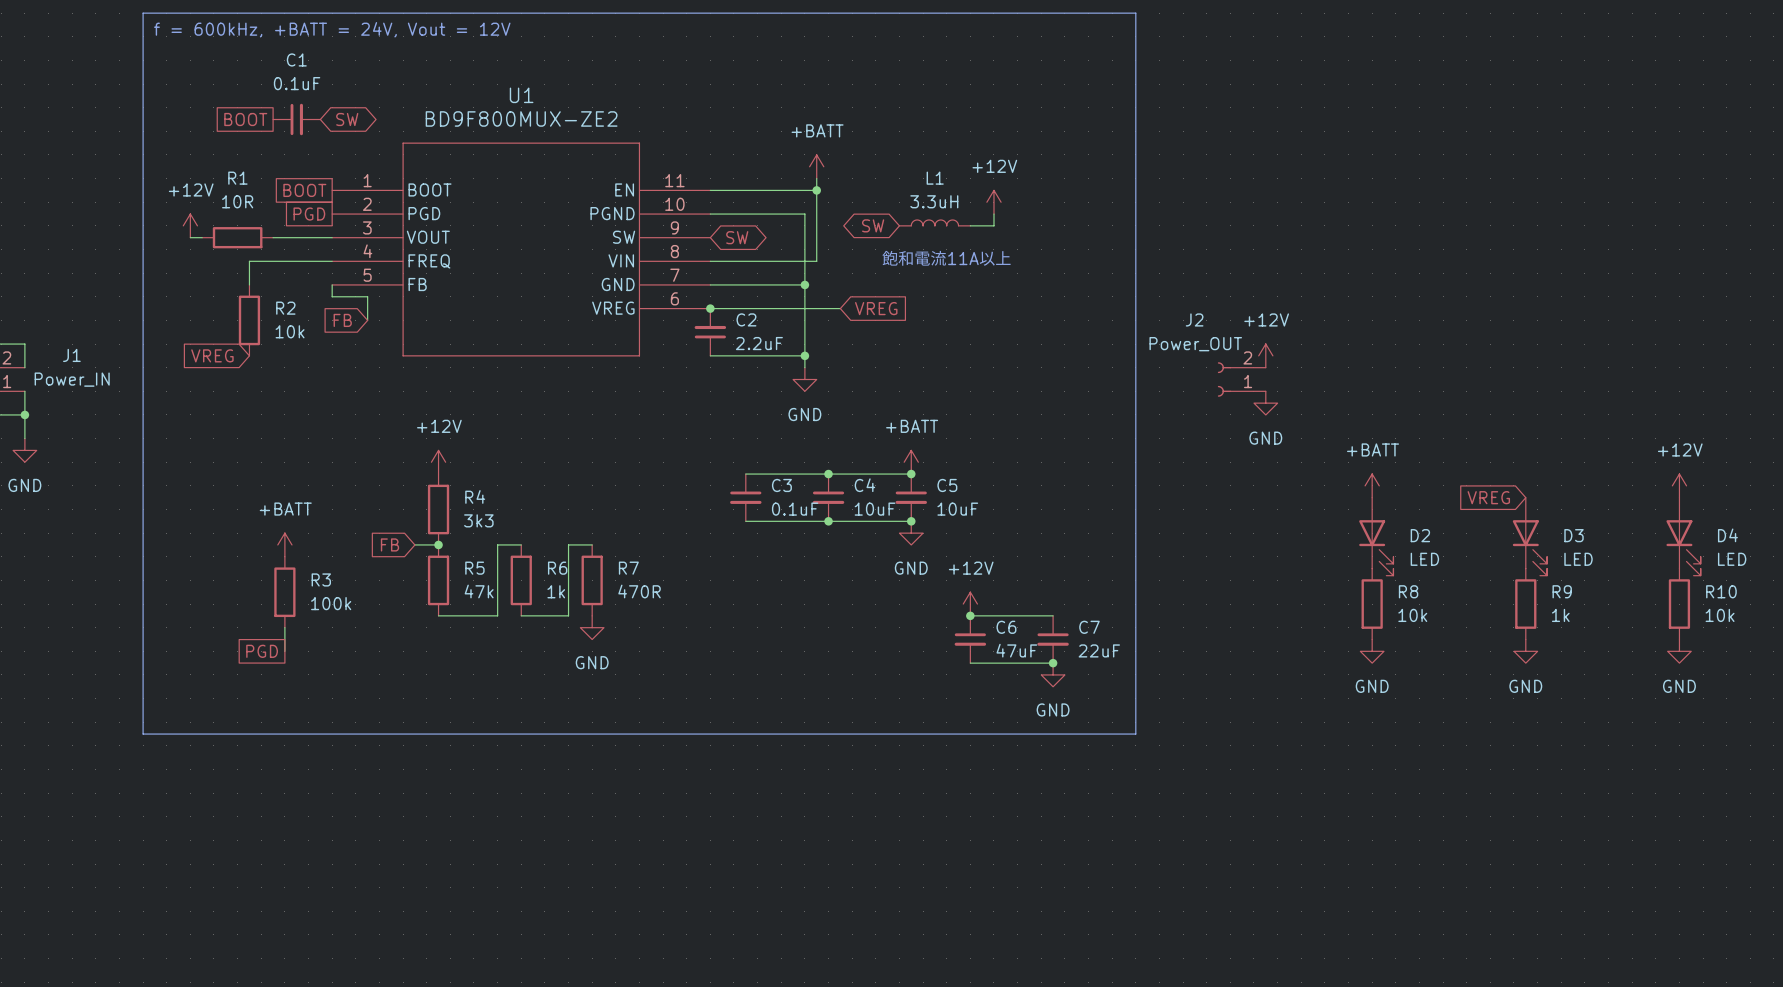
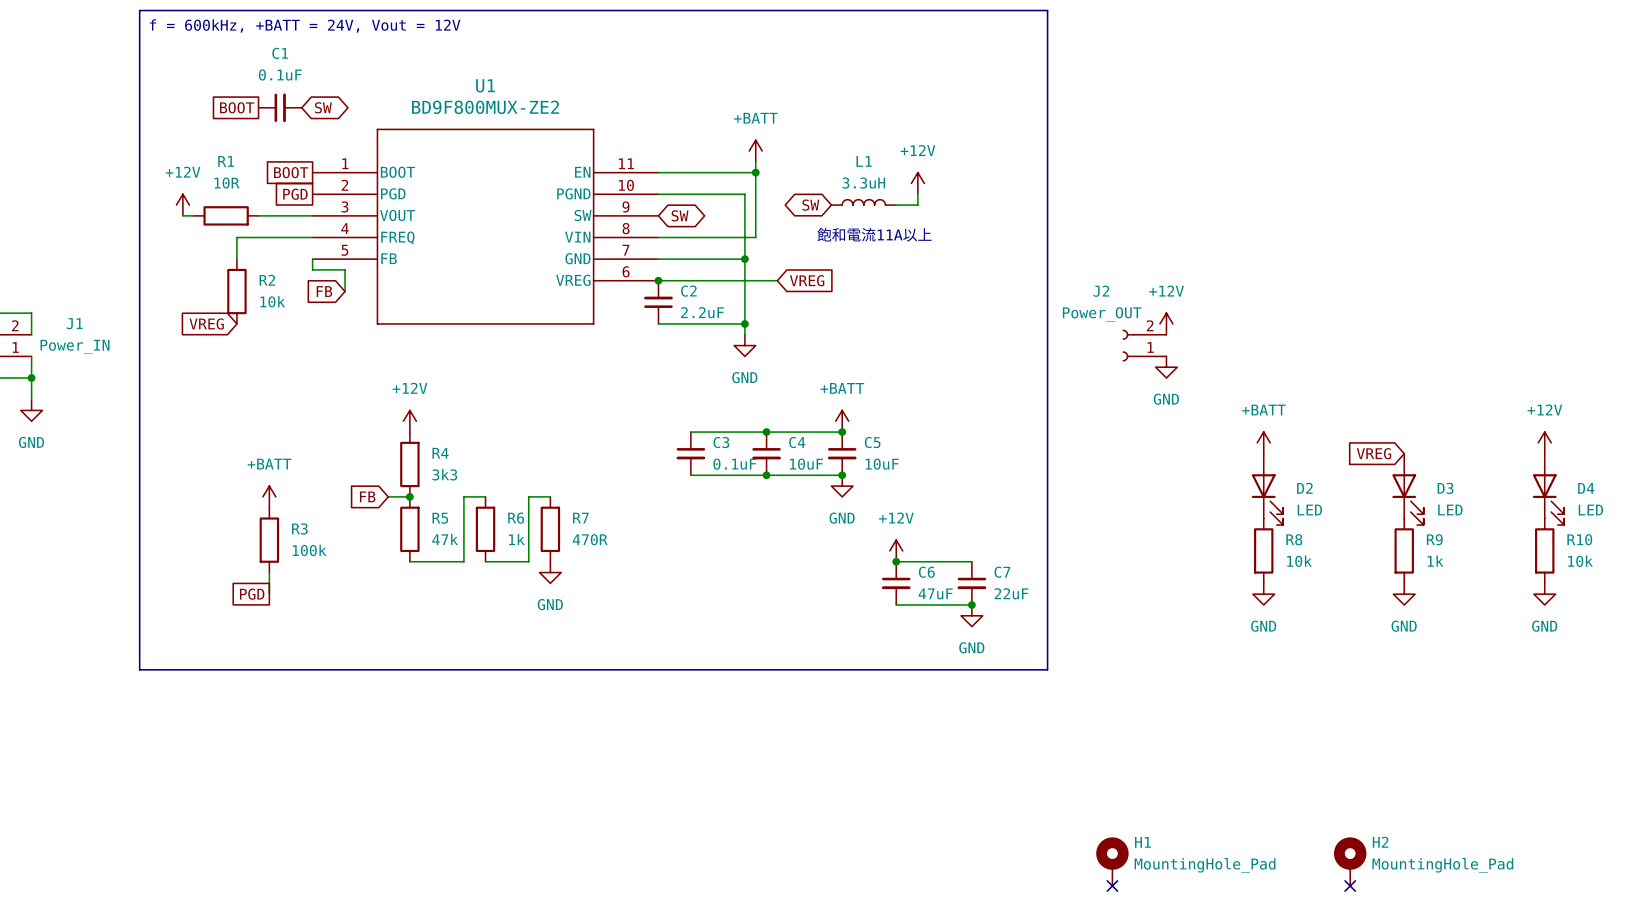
H1: none -> MountingHole_Pad (1112, 861)
H2: none -> MountingHole_Pad (1350, 861)
no-connect mark: none -> (1112, 886)
no-connect mark: none -> (1350, 886)

